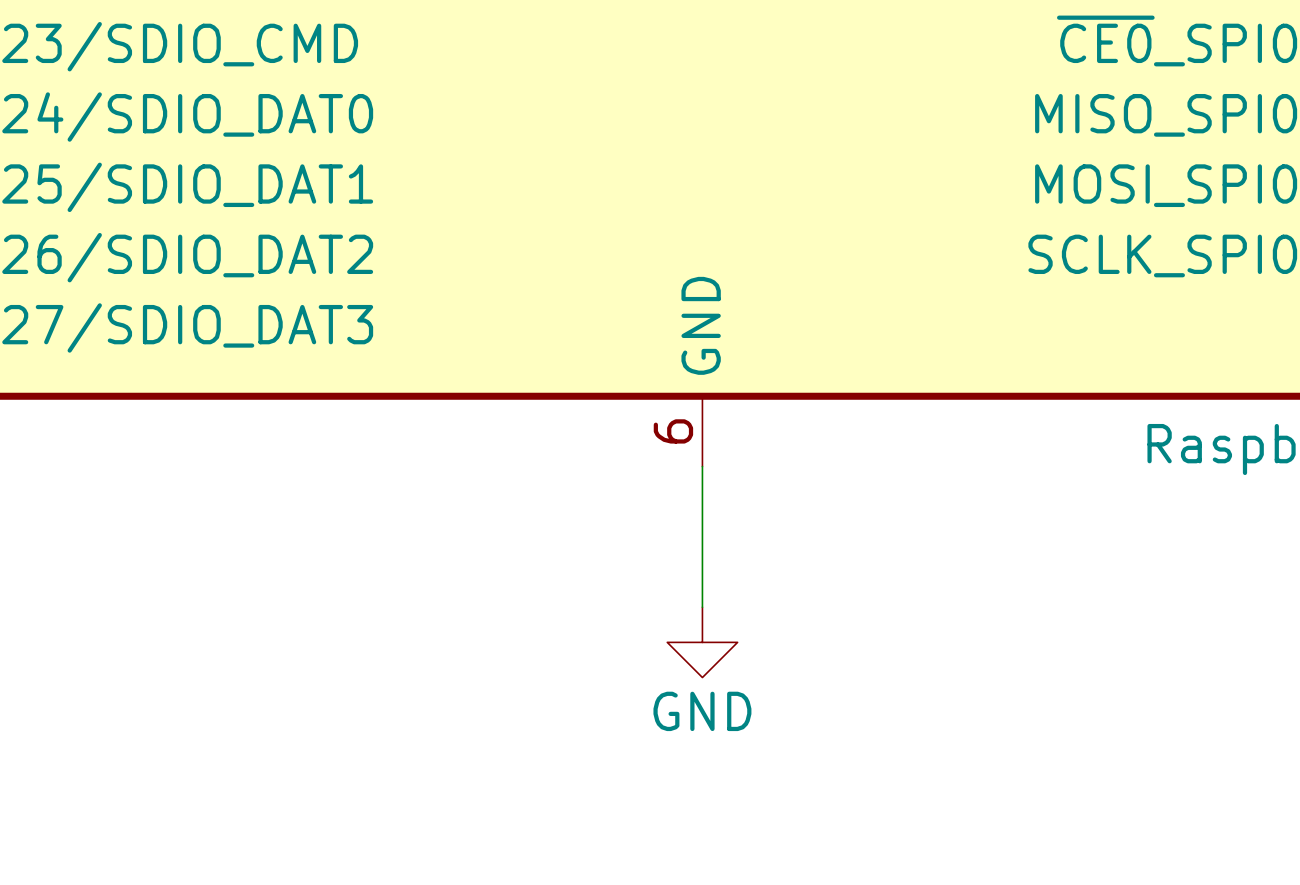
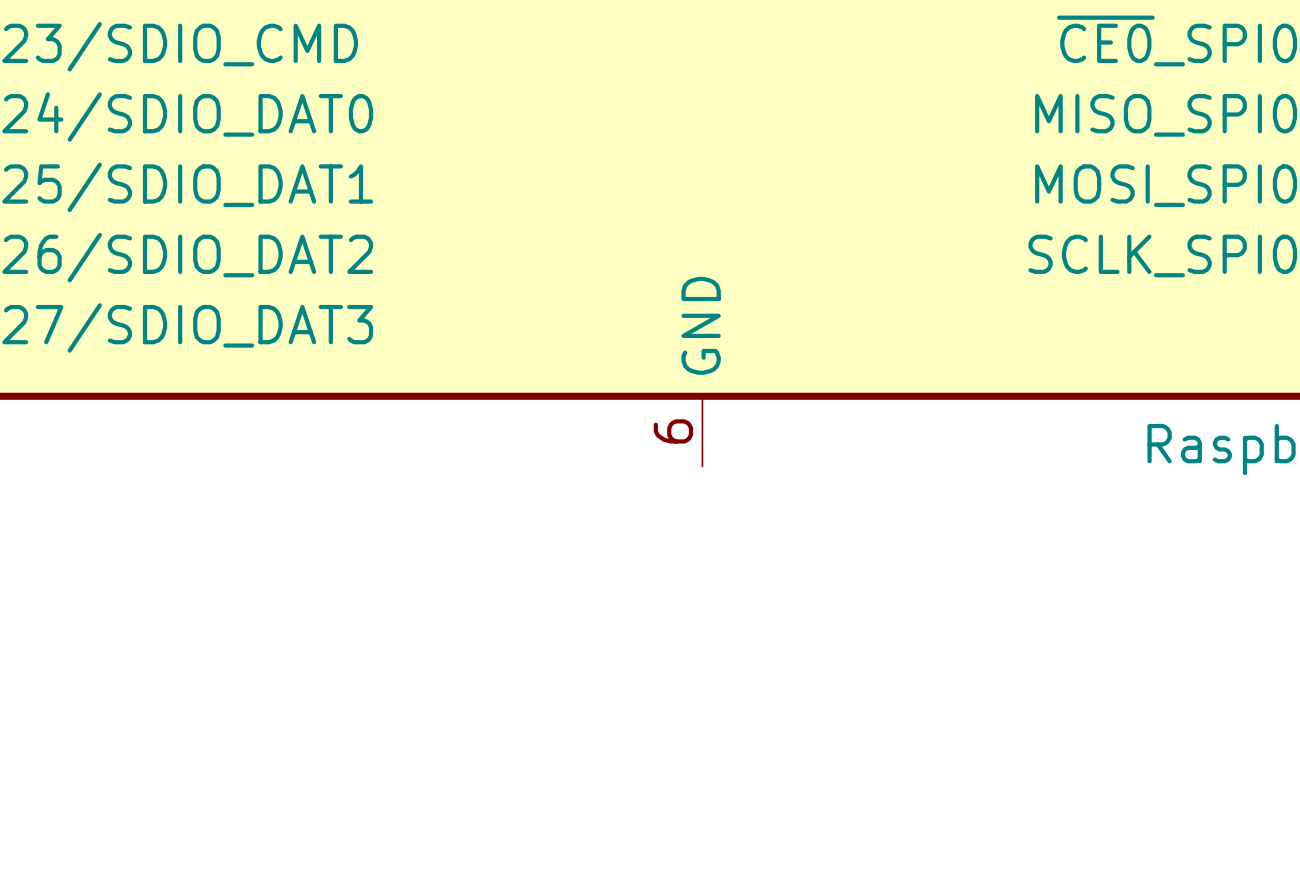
wire: (702, 466) (702, 607) -> none
power symbol: GND (702, 642) -> none

